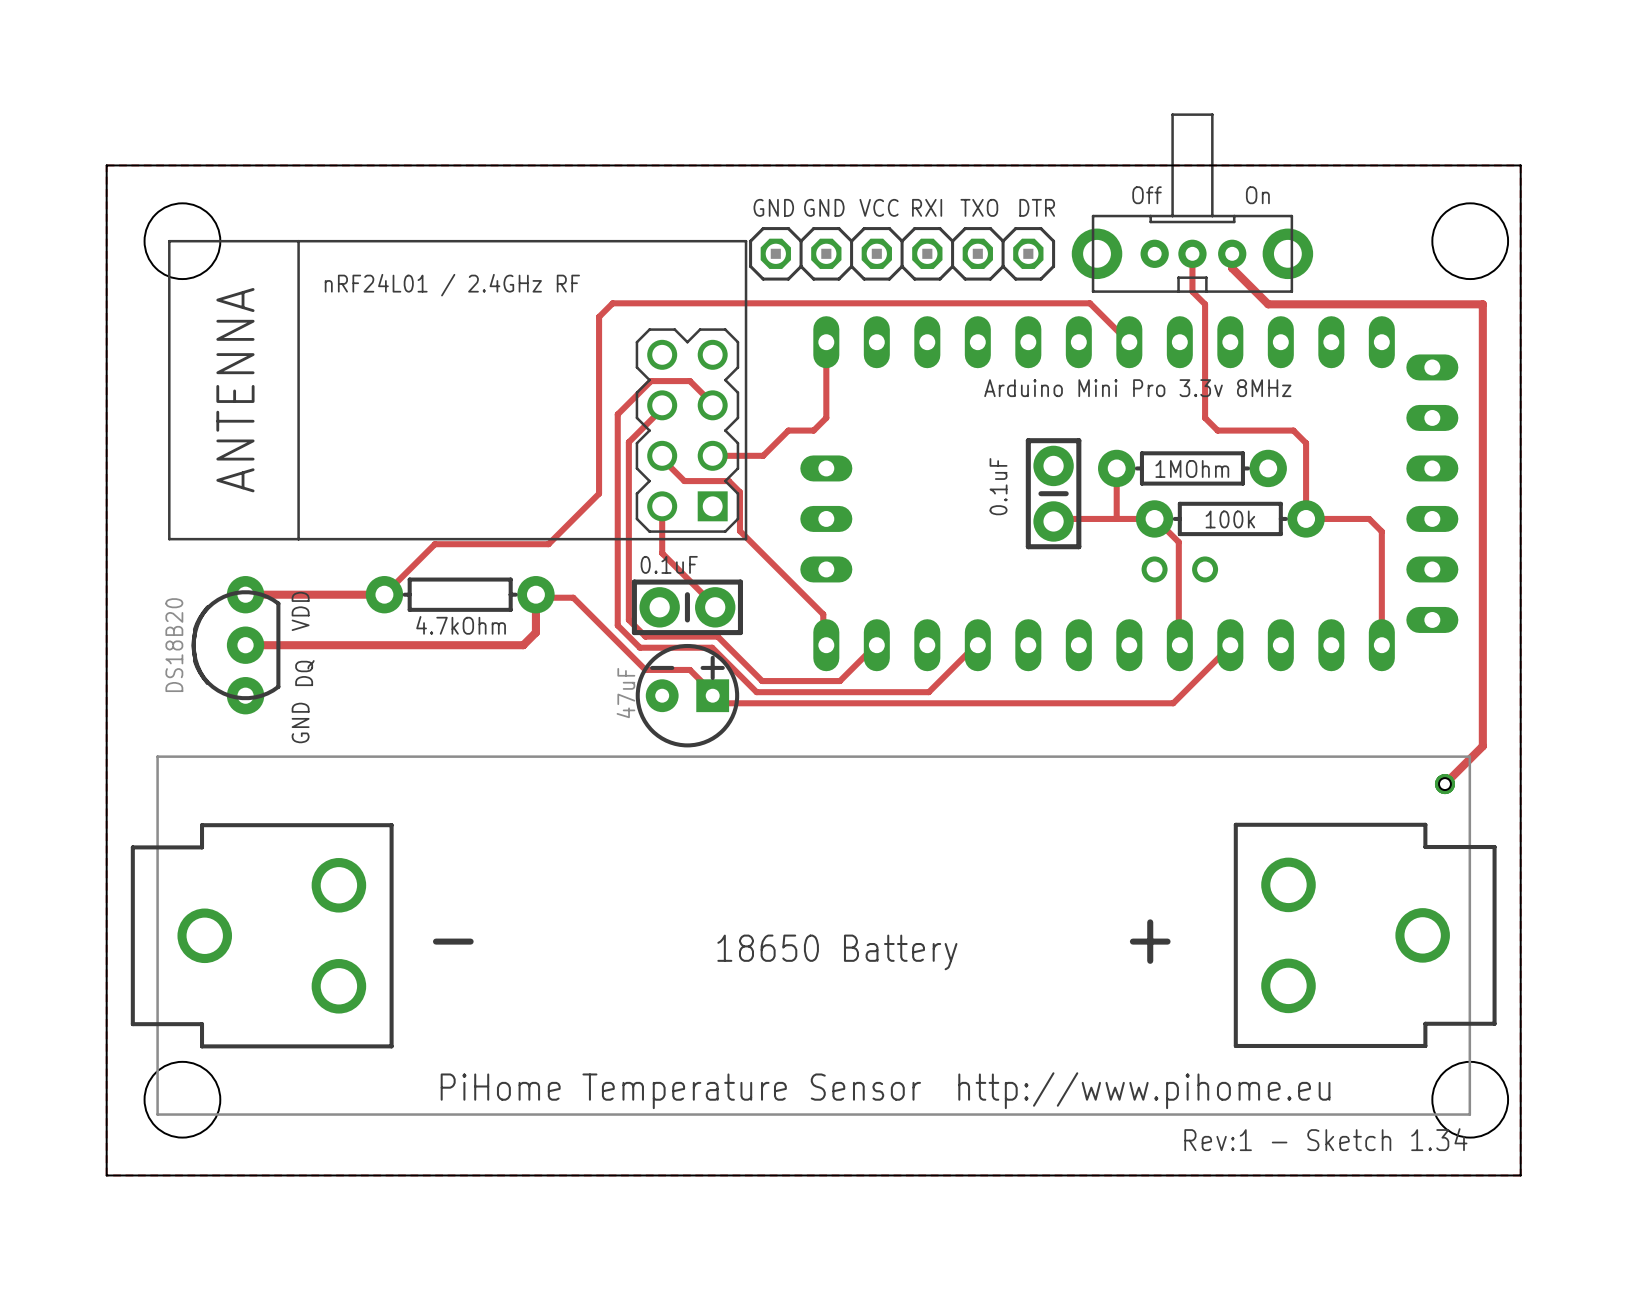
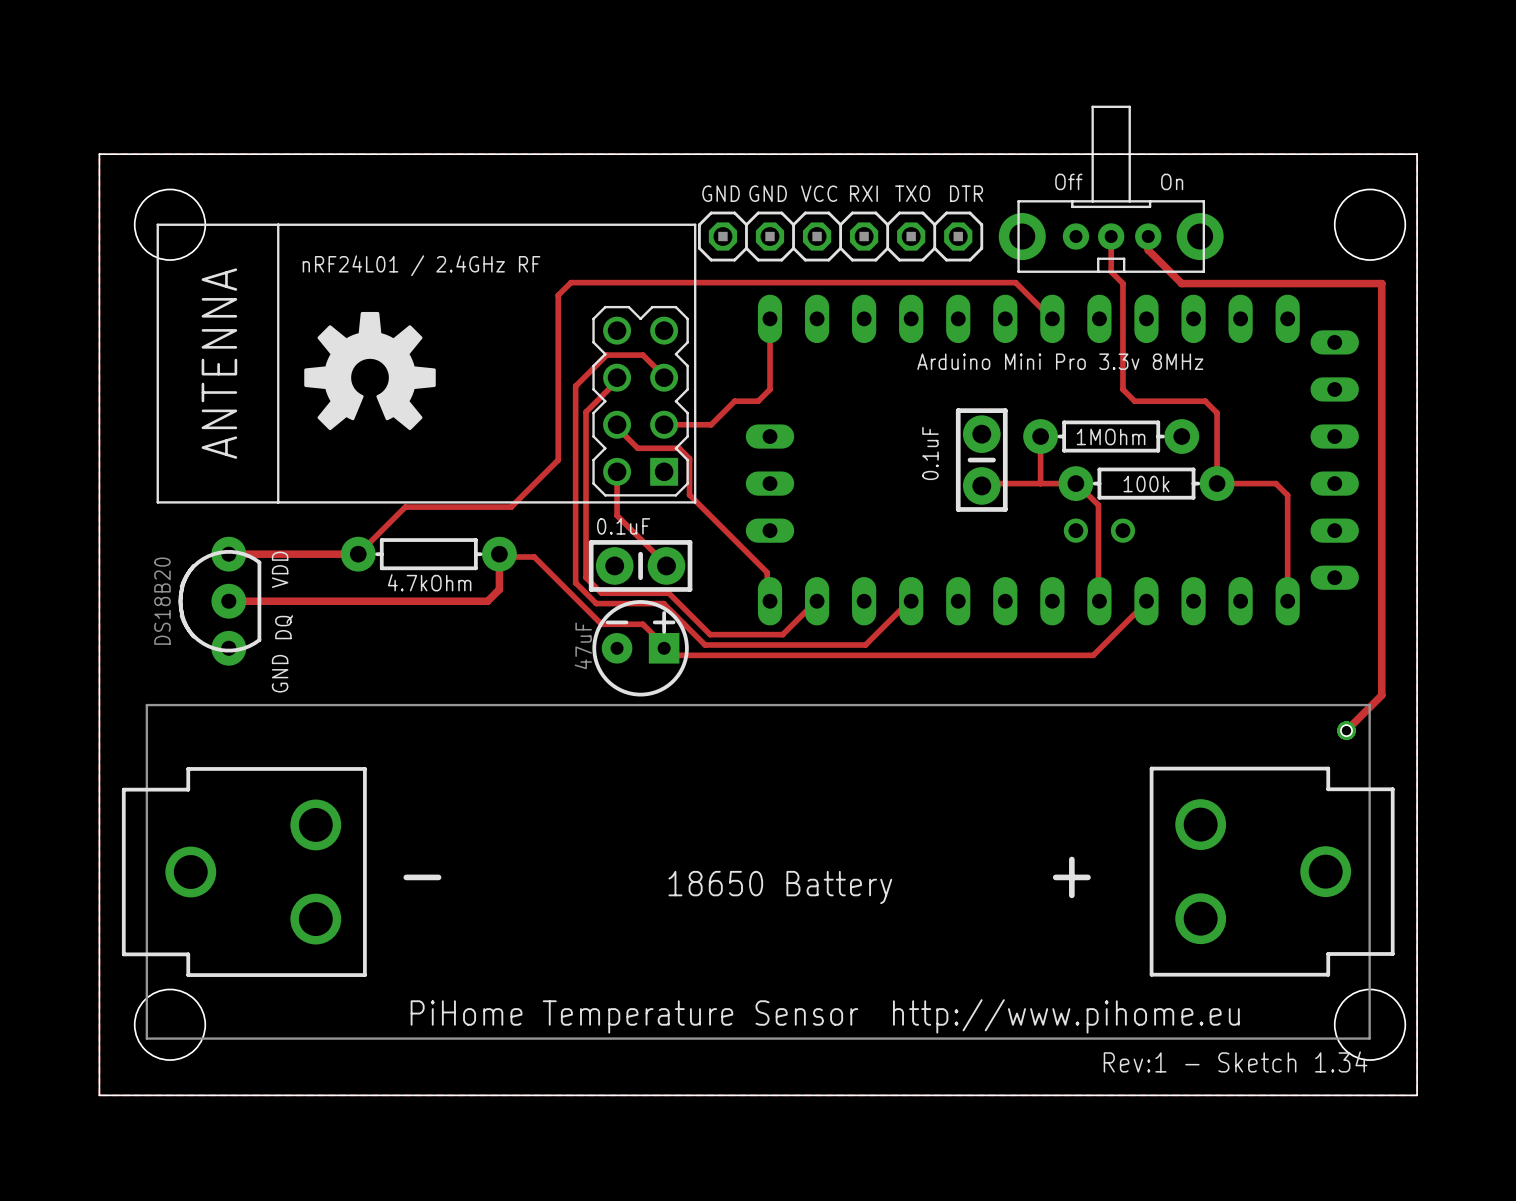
drawing: none -> [304, 311, 436, 431]

